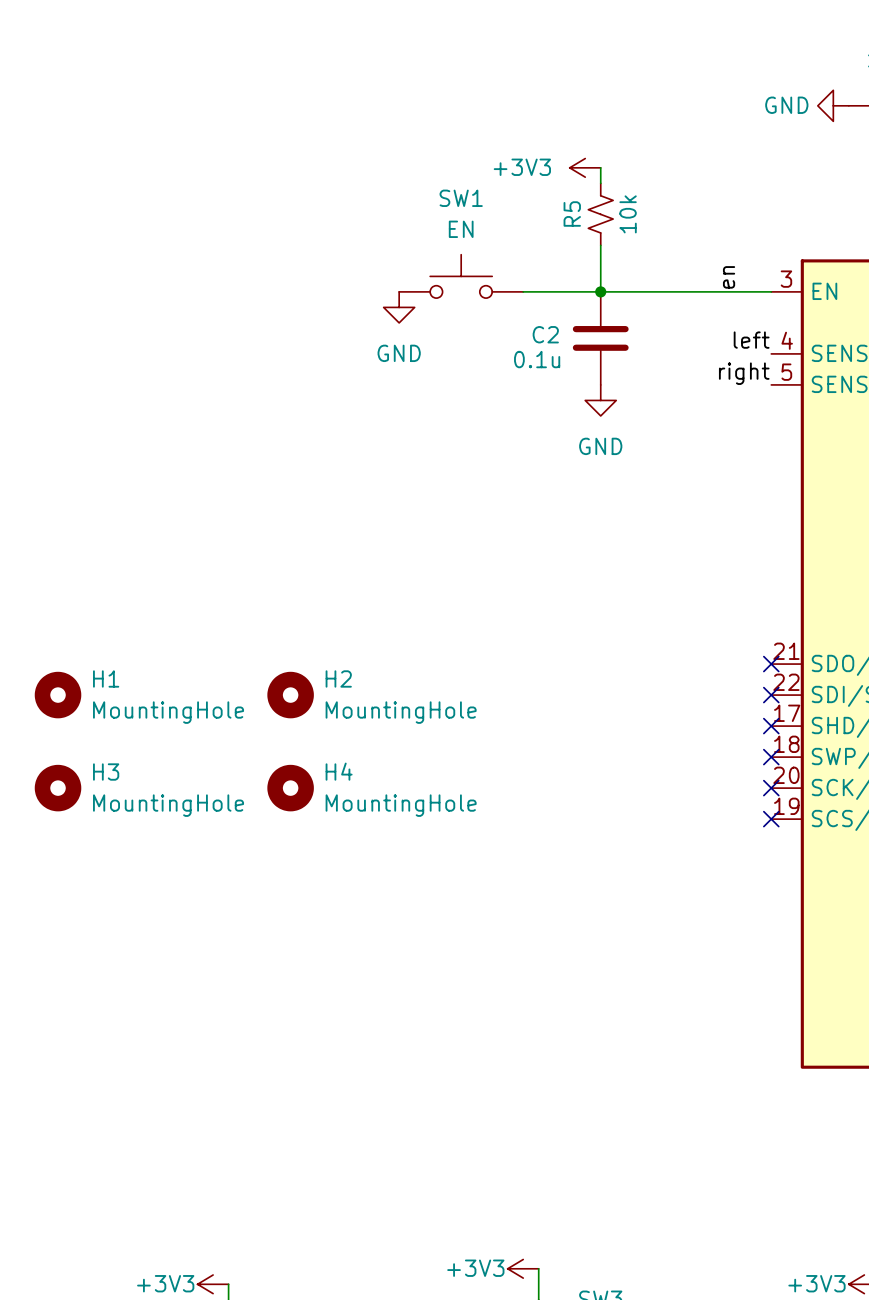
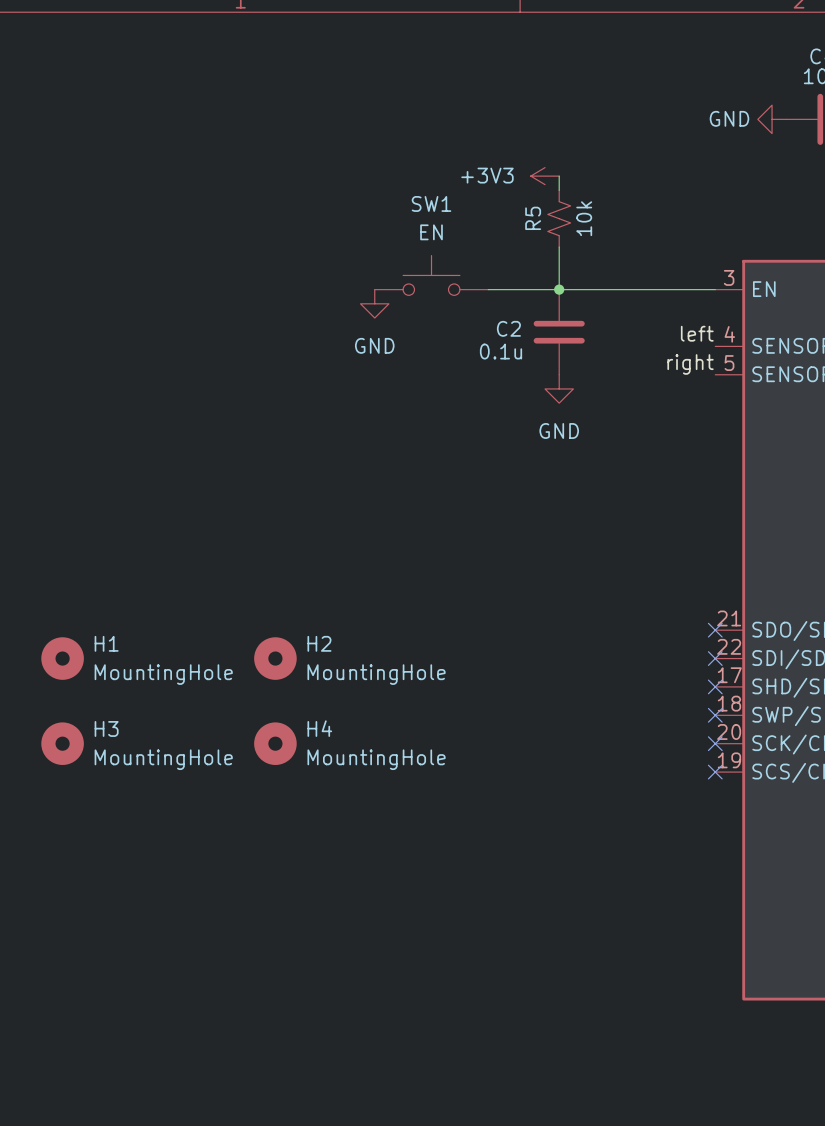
label: en (729, 277) -> none

